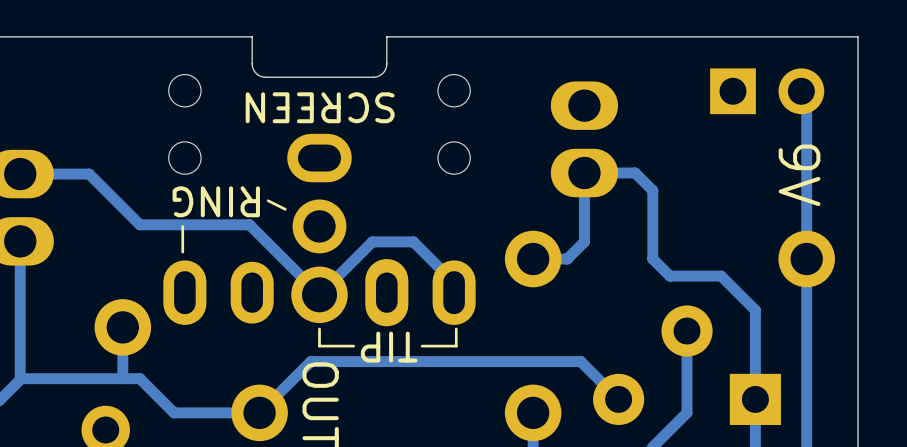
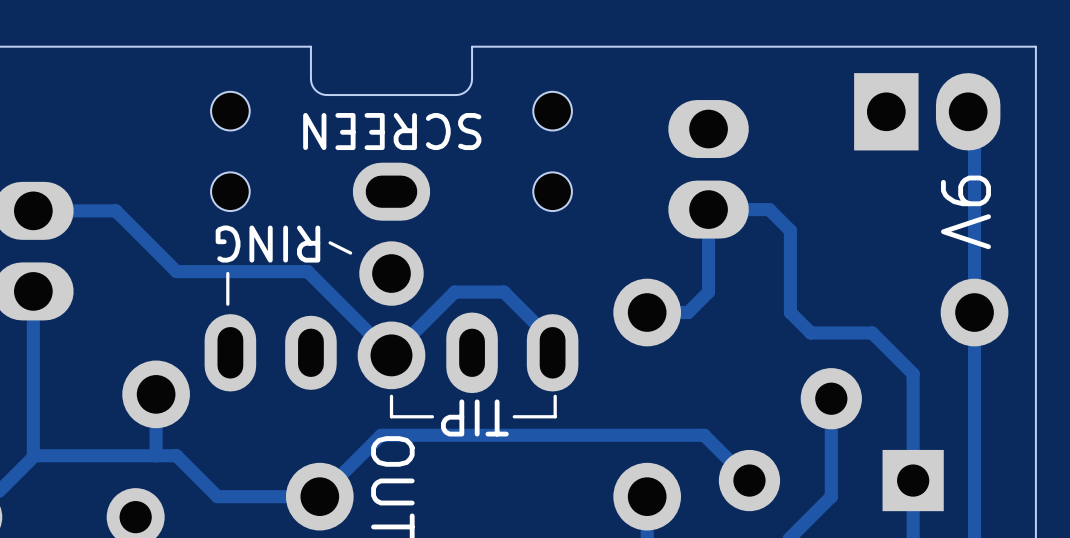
part footprint: [710, 68, 825, 115] -> [854, 73, 1001, 151]

